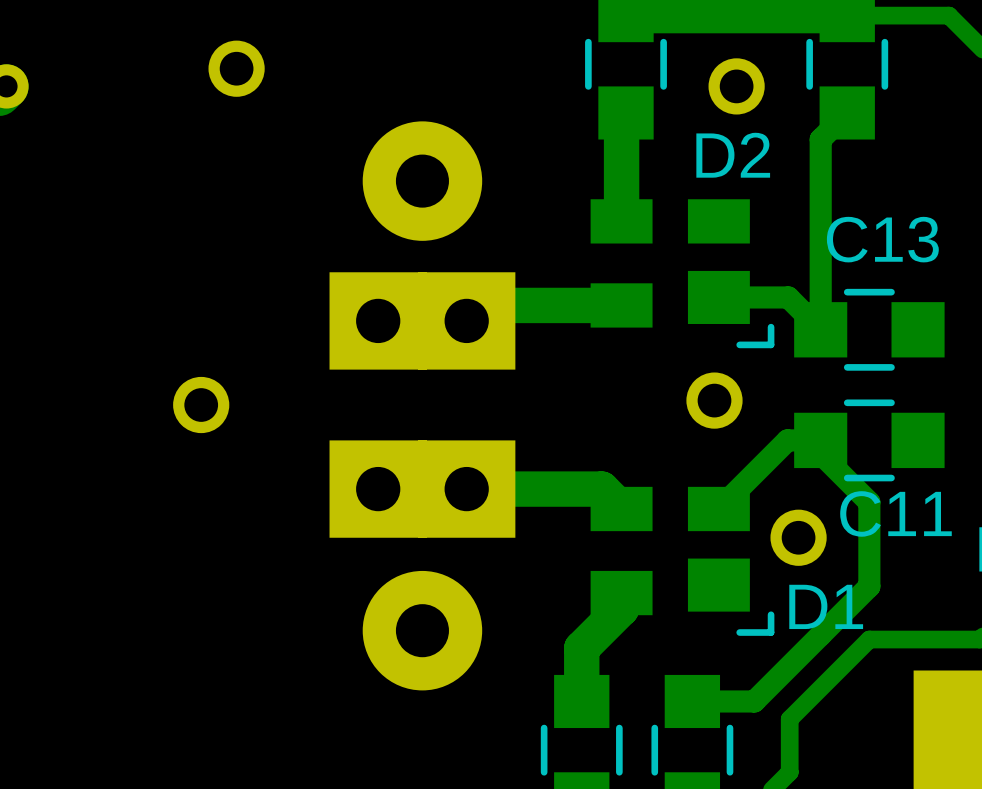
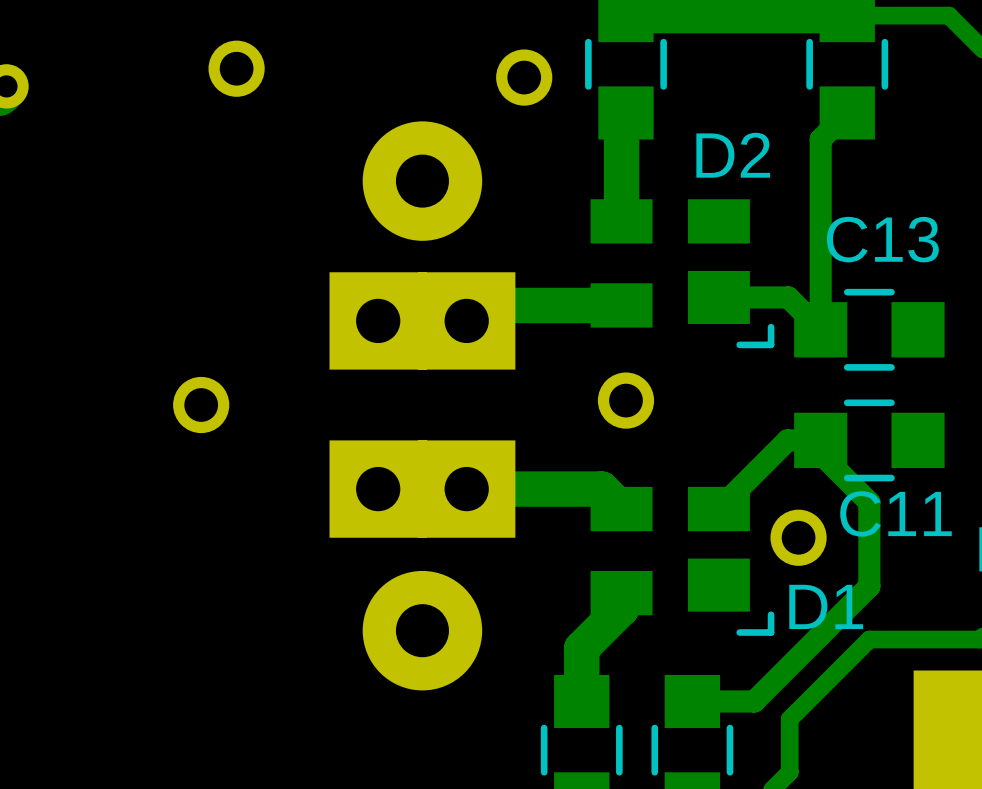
part: none -> (524, 77)
part: (736, 86) -> none
part position: (714, 400) -> (625, 400)

